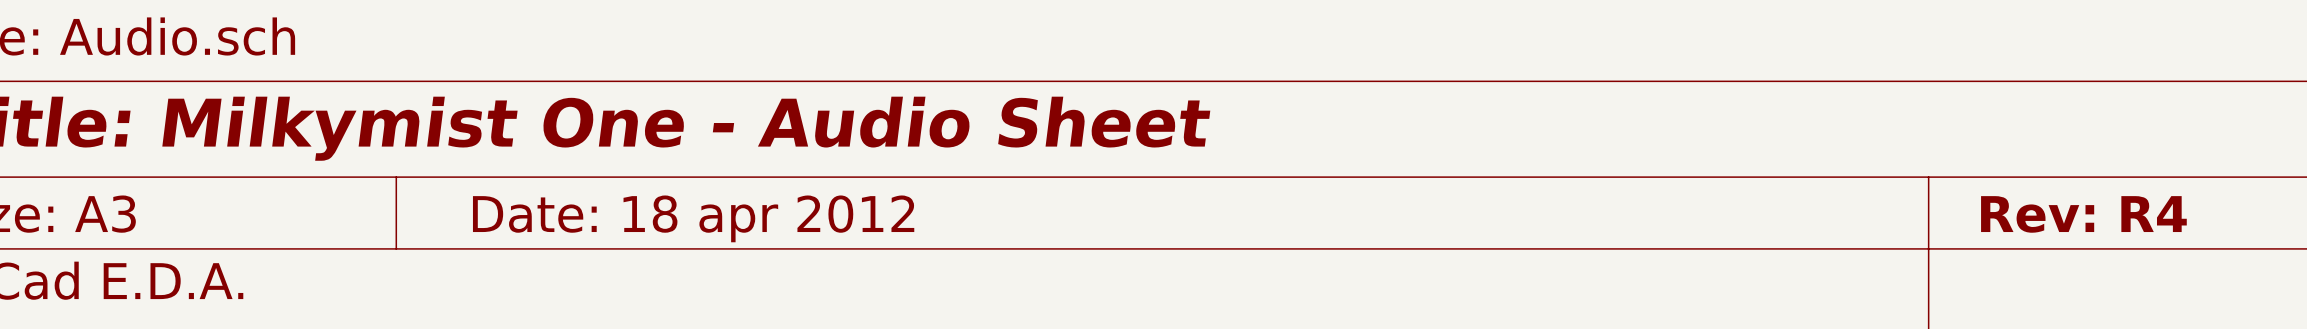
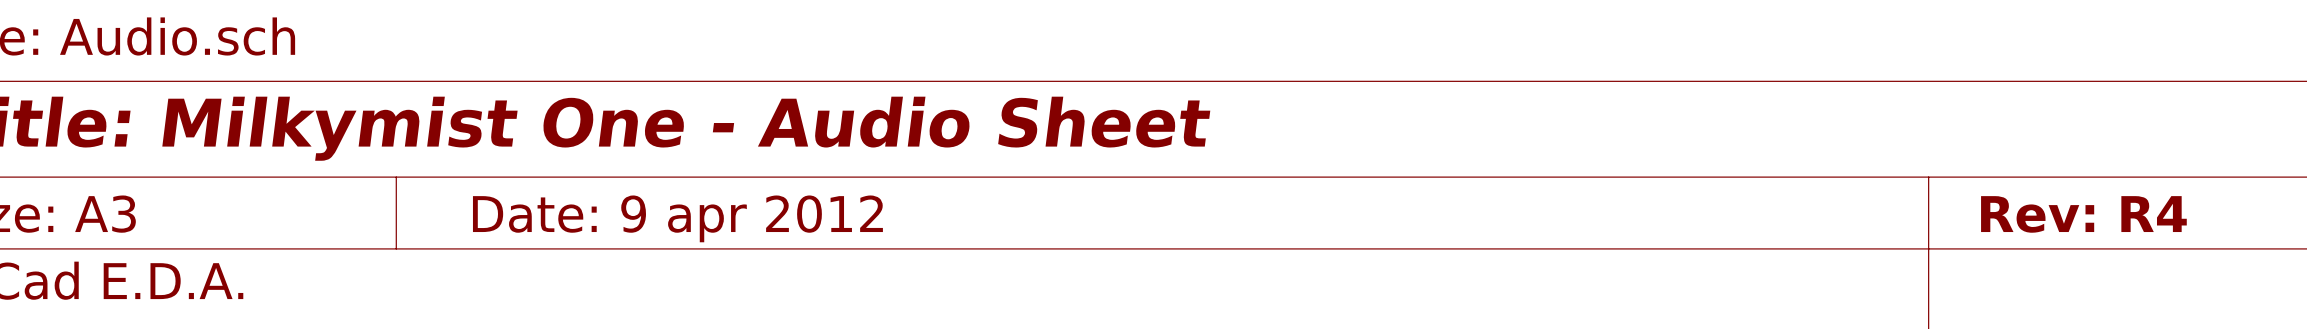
title block: Date: 18 apr 2012 (693, 218) -> Date: 9 apr 2012 (677, 218)

